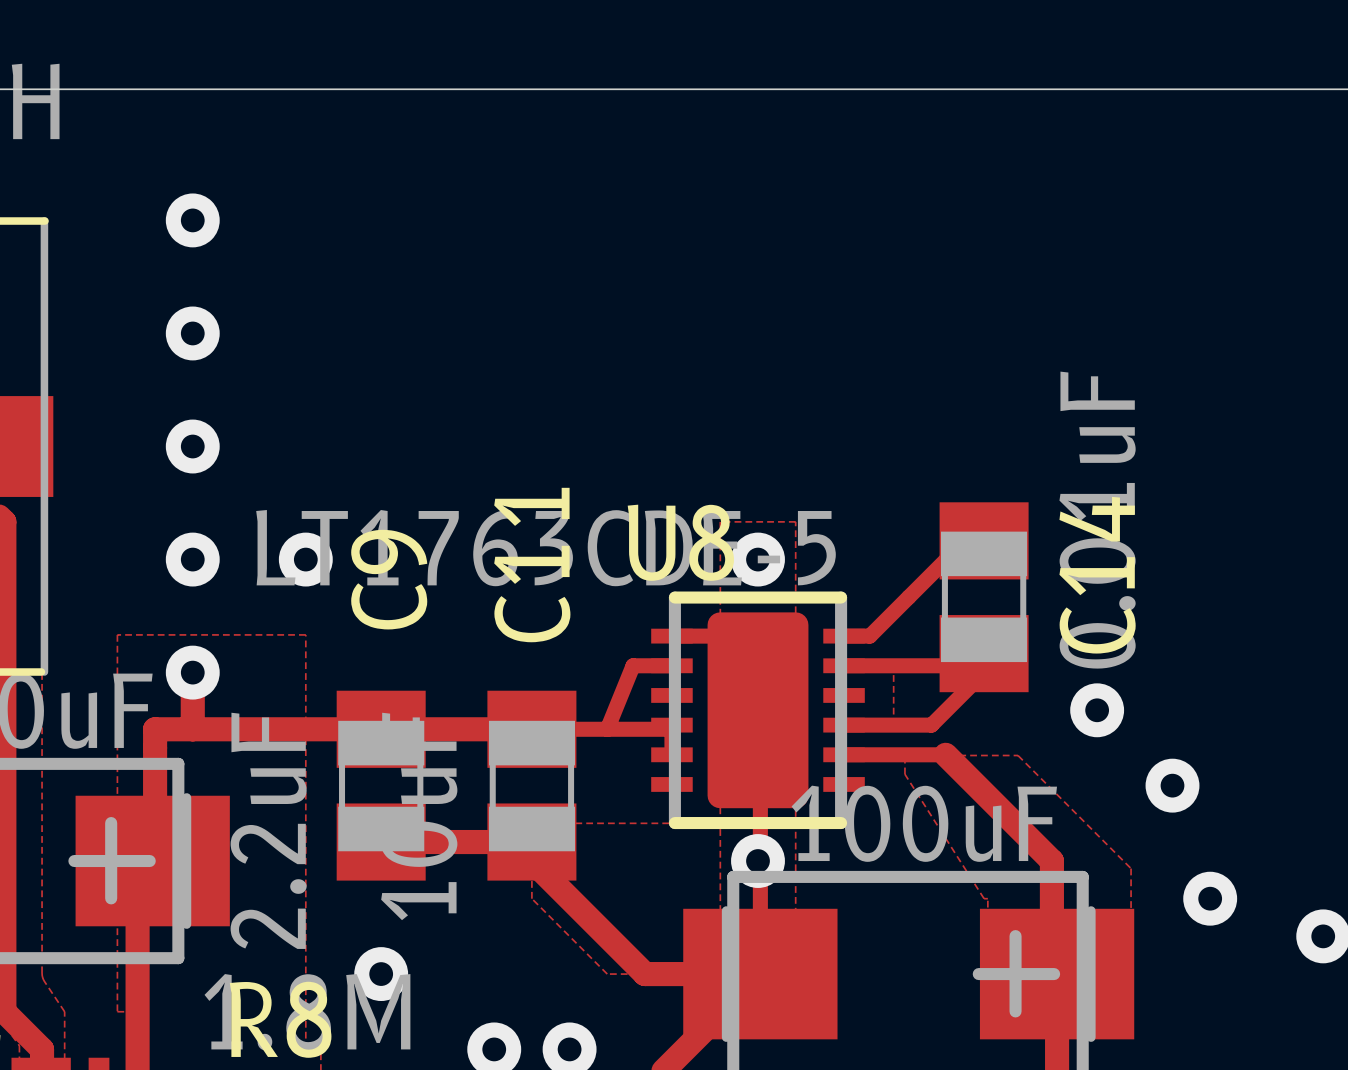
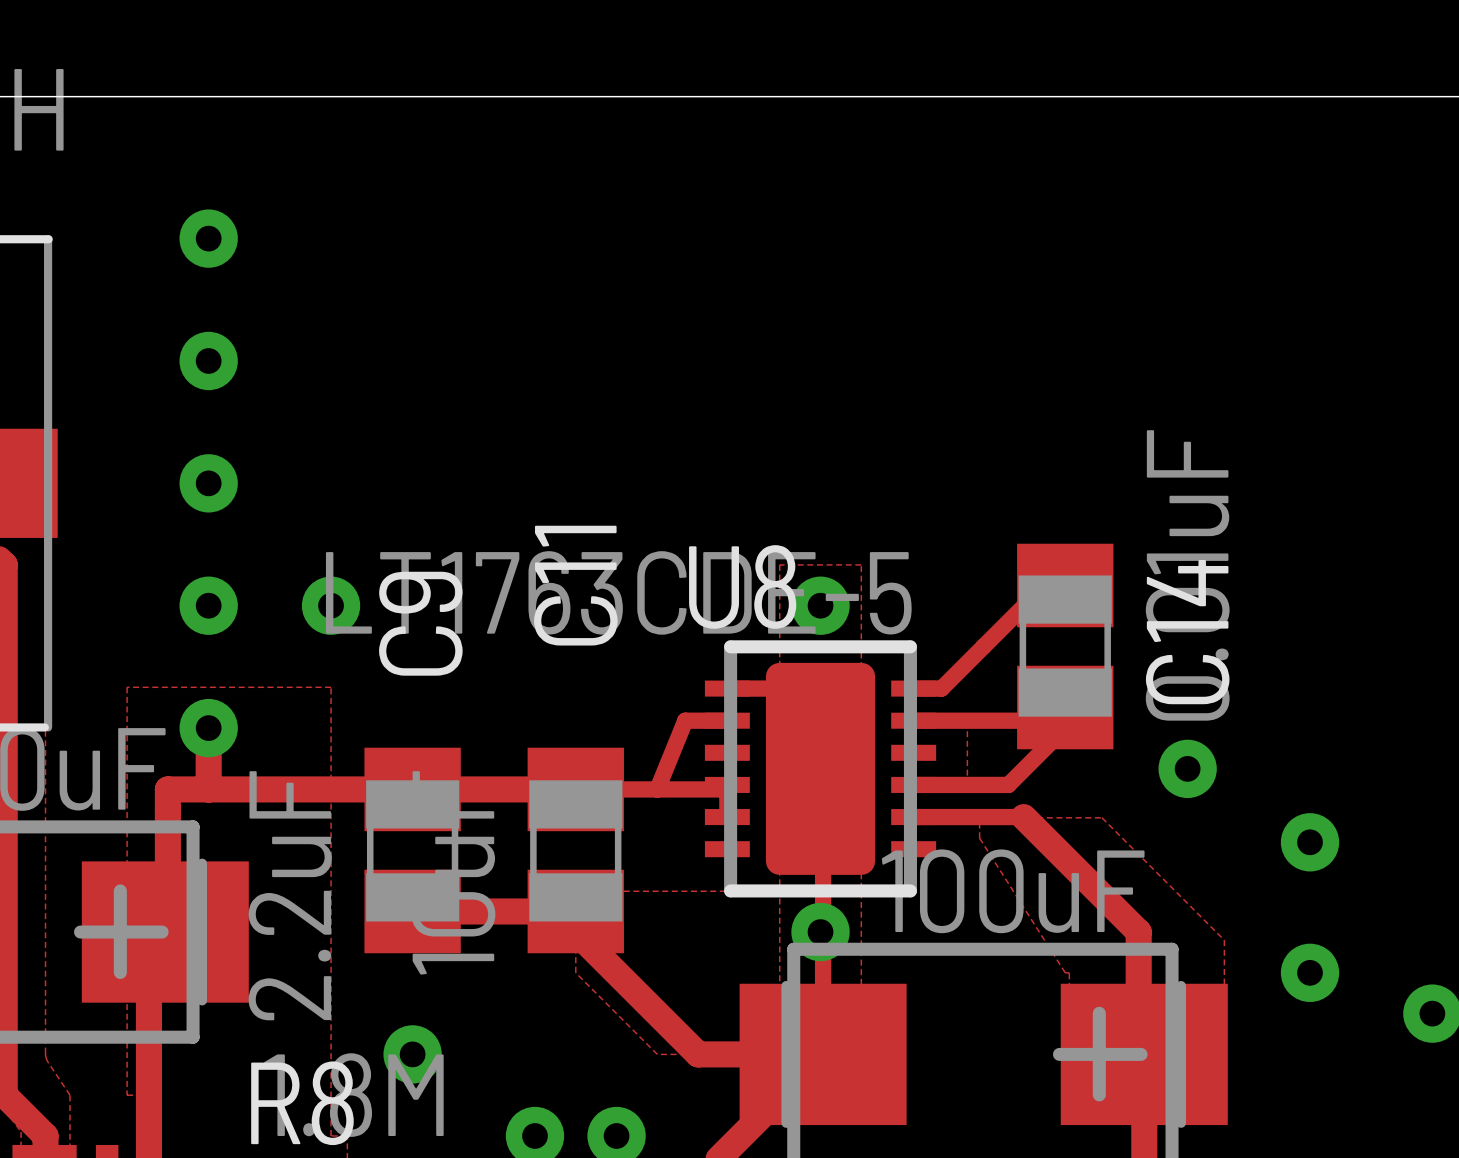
via position: (1172, 785) -> (1310, 842)

